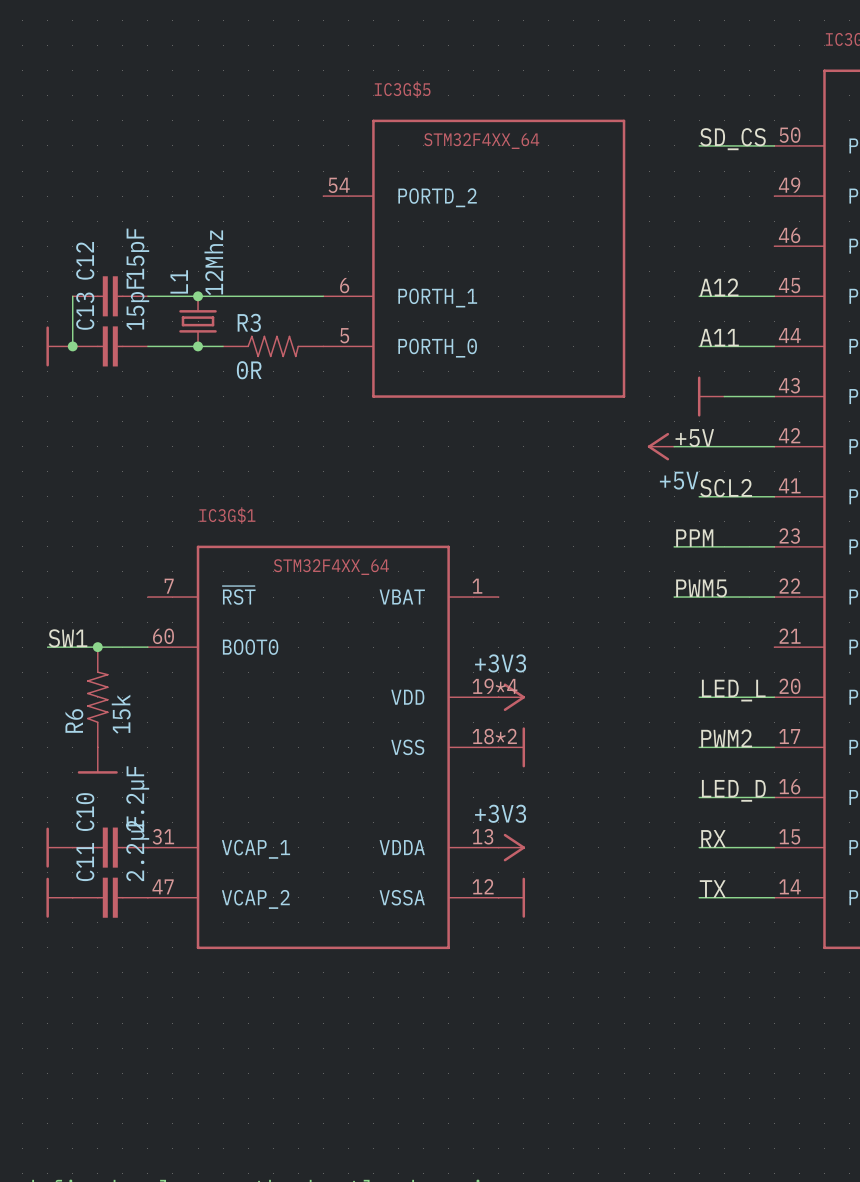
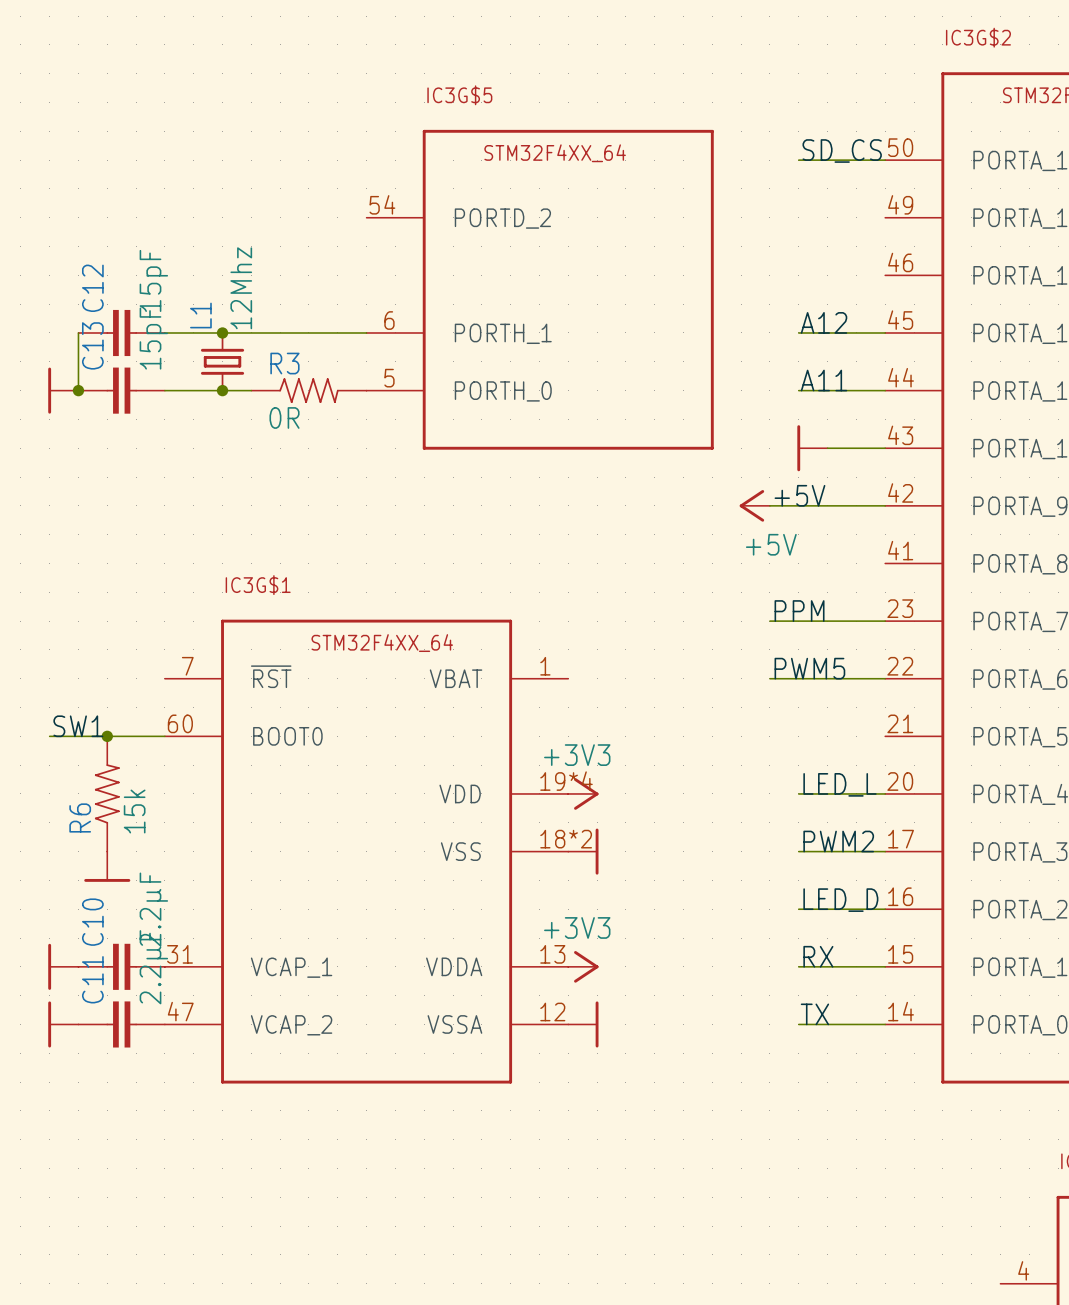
label: SCL2 (726, 488) -> none
wire: (699, 496) (774, 496) -> none

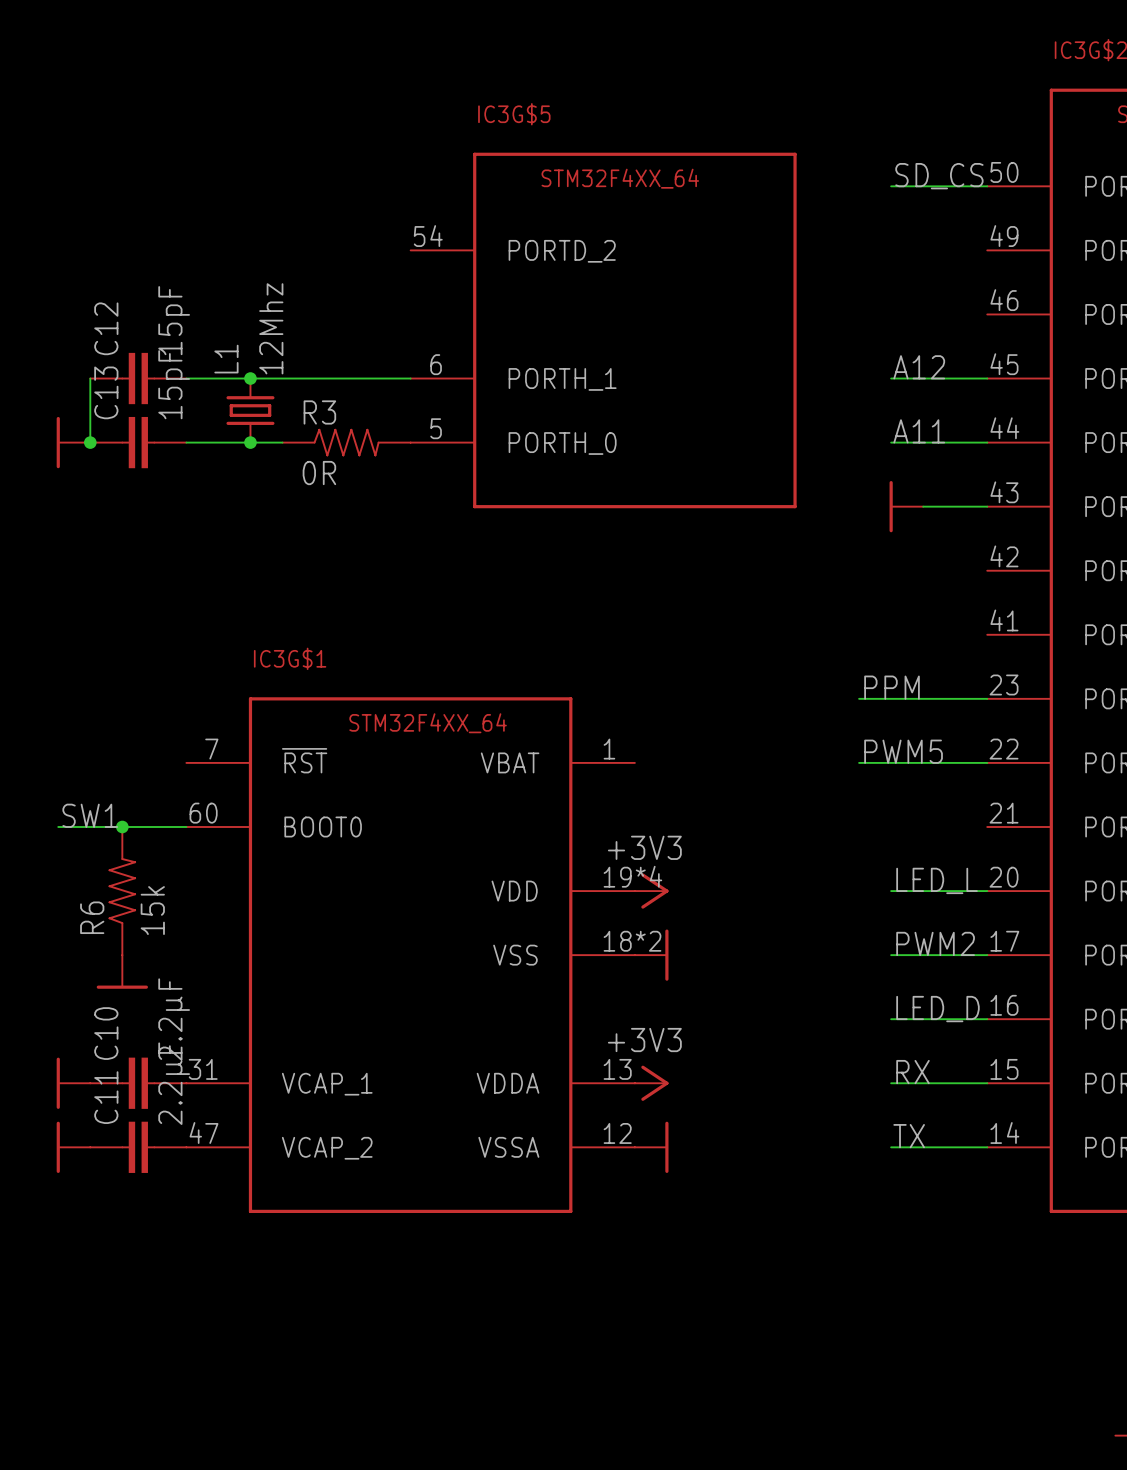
label: +5V (799, 495) -> none
power symbol: +5V (754, 505) -> none
wire: (769, 505) (885, 505) -> none

